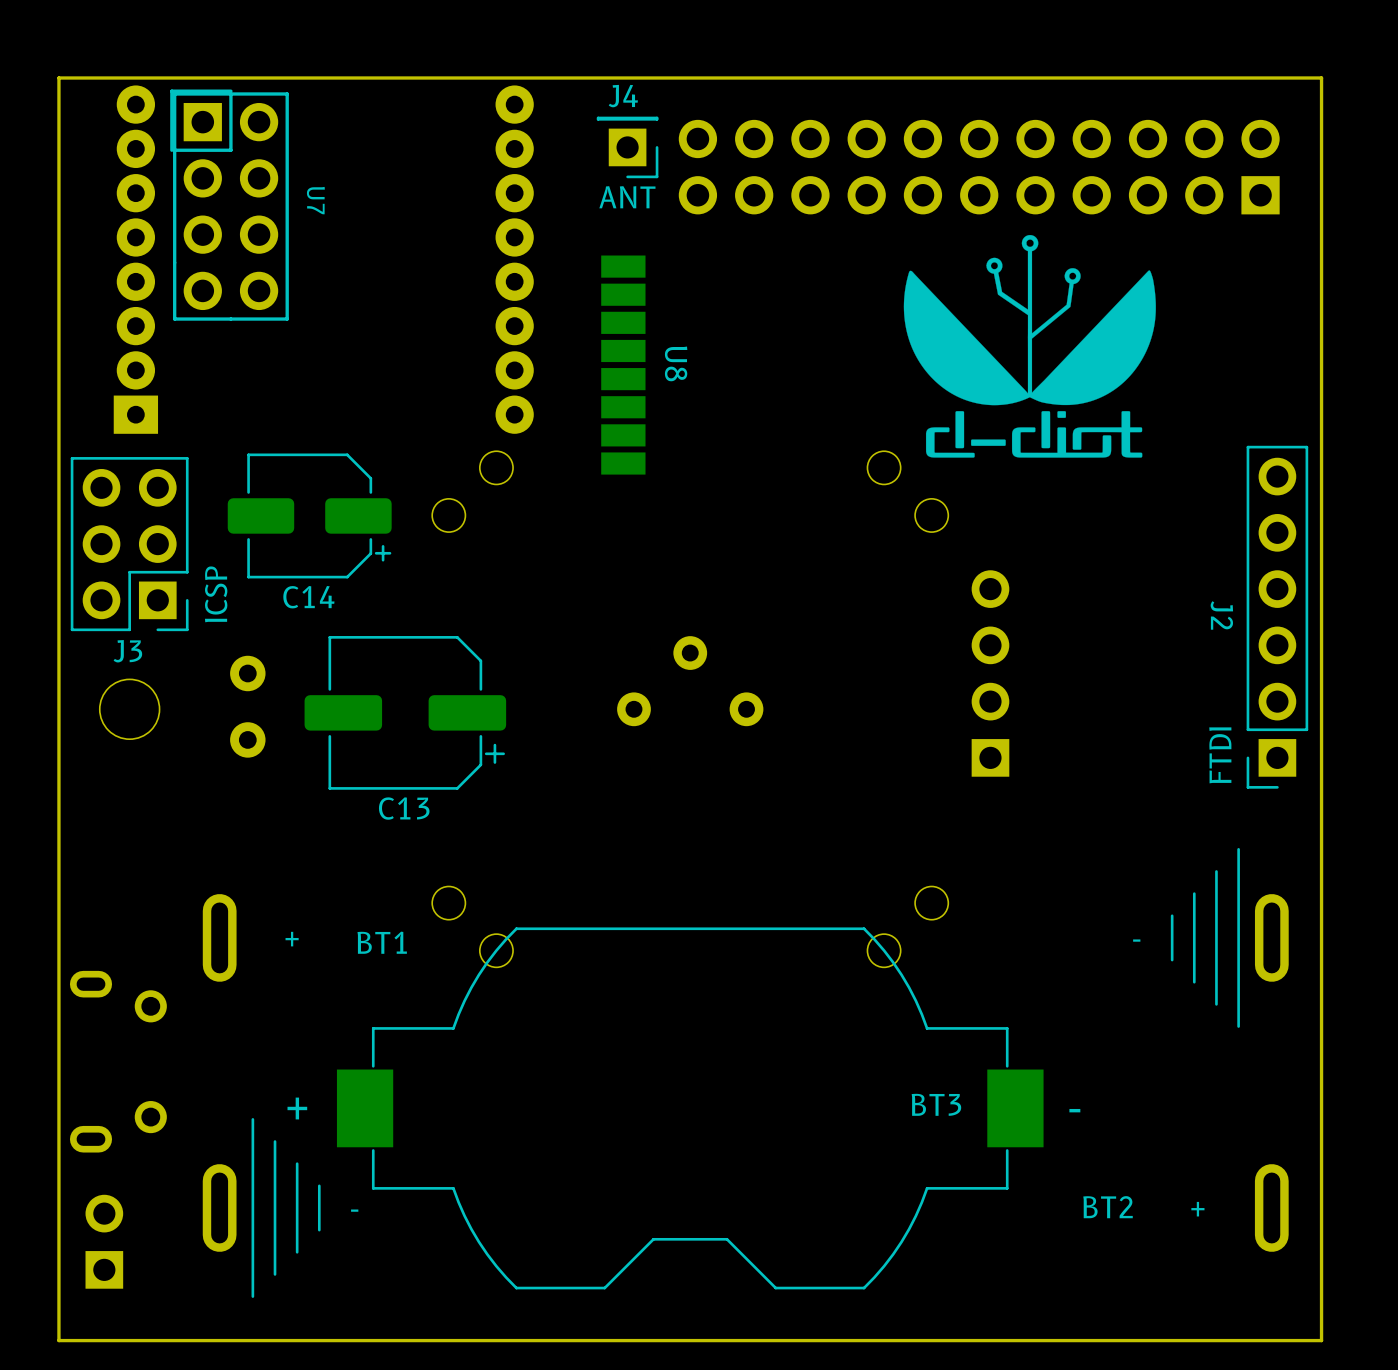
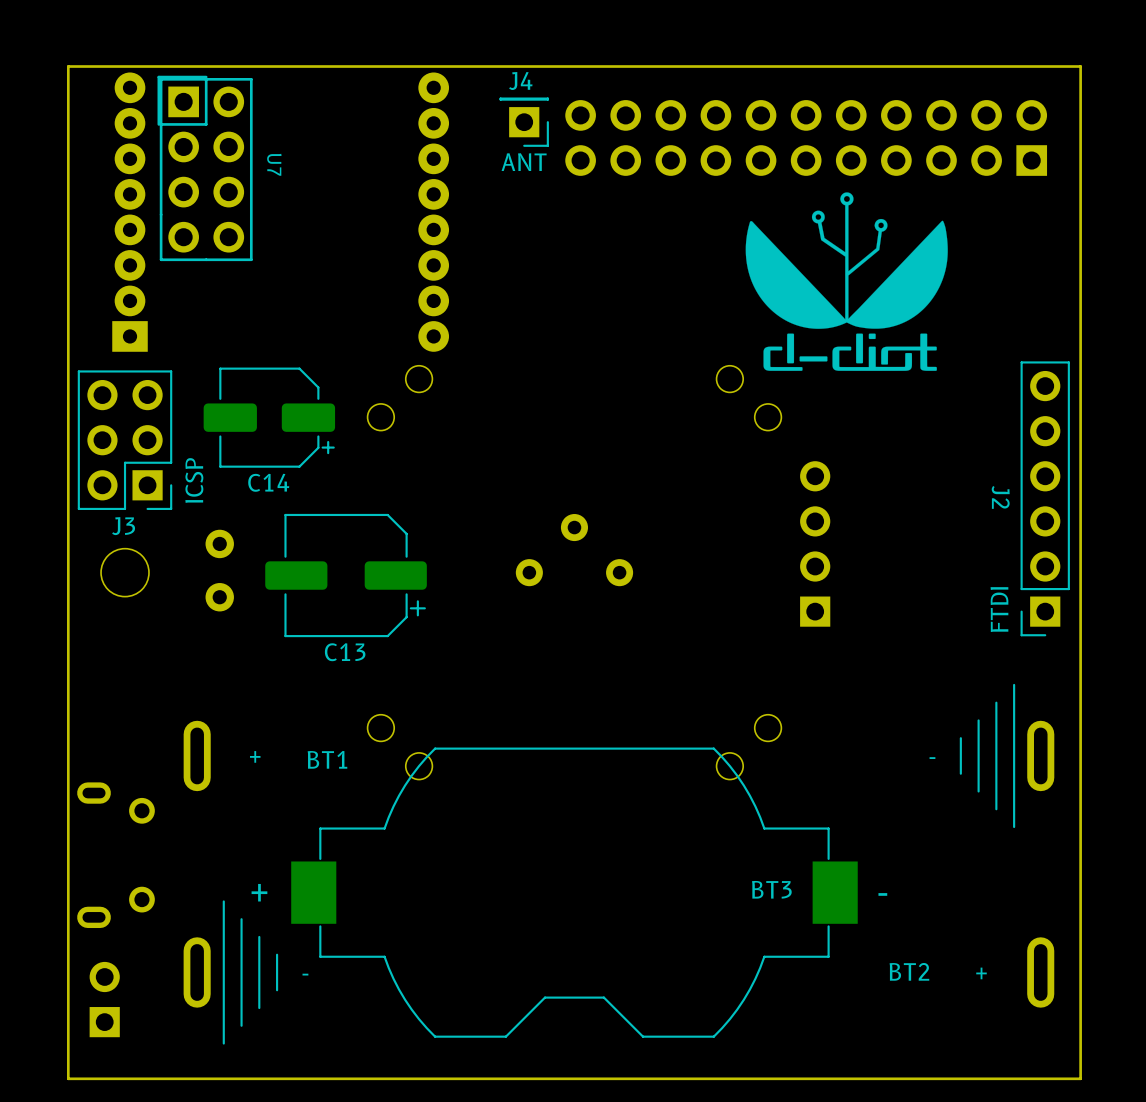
U8: (623, 365) -> none

